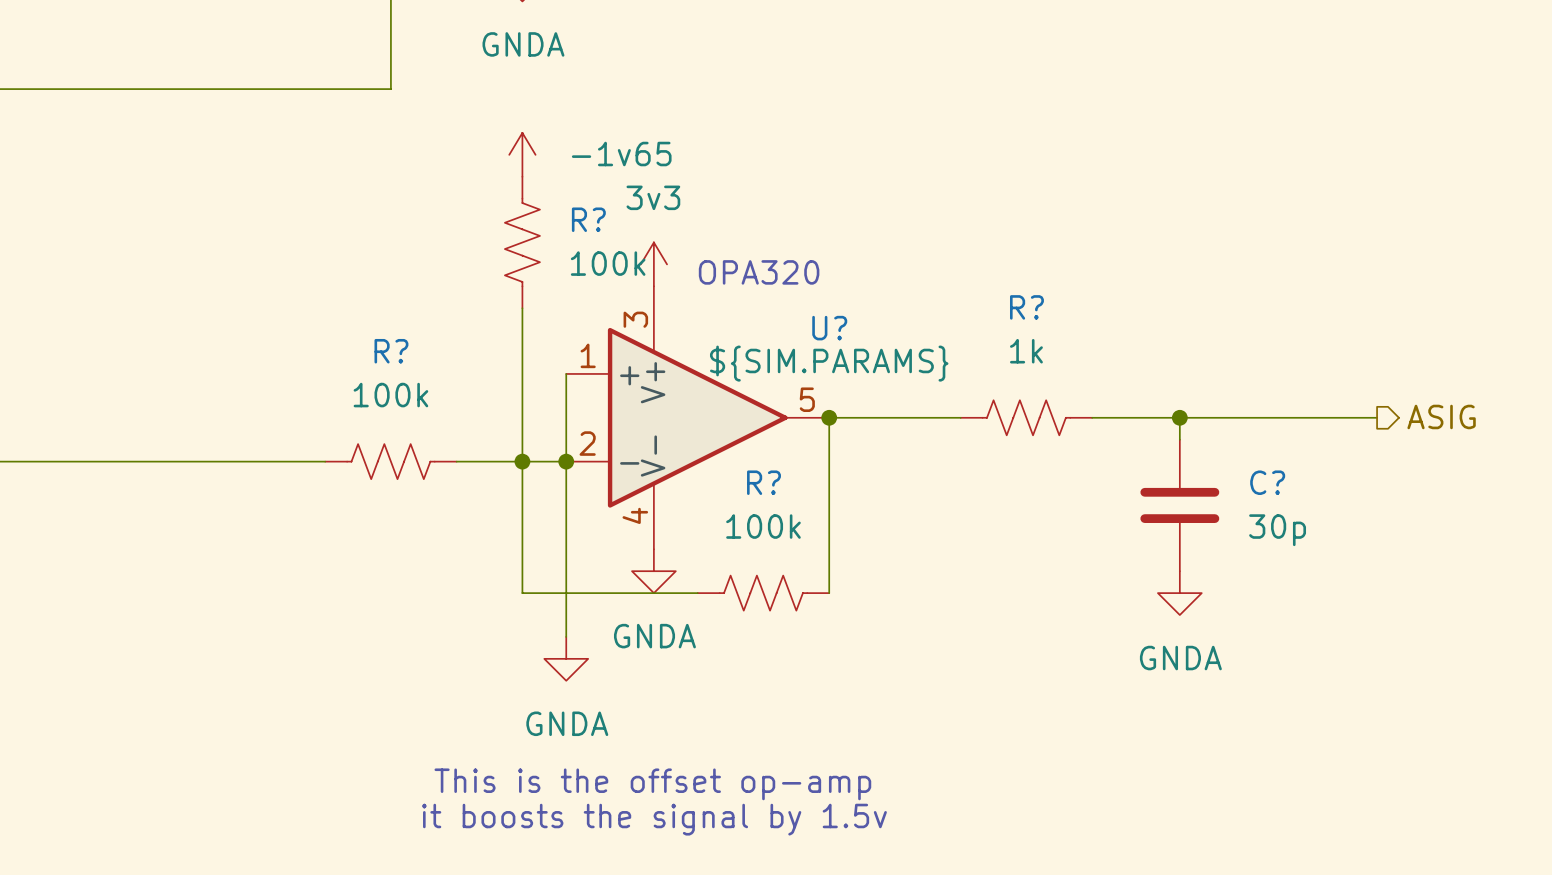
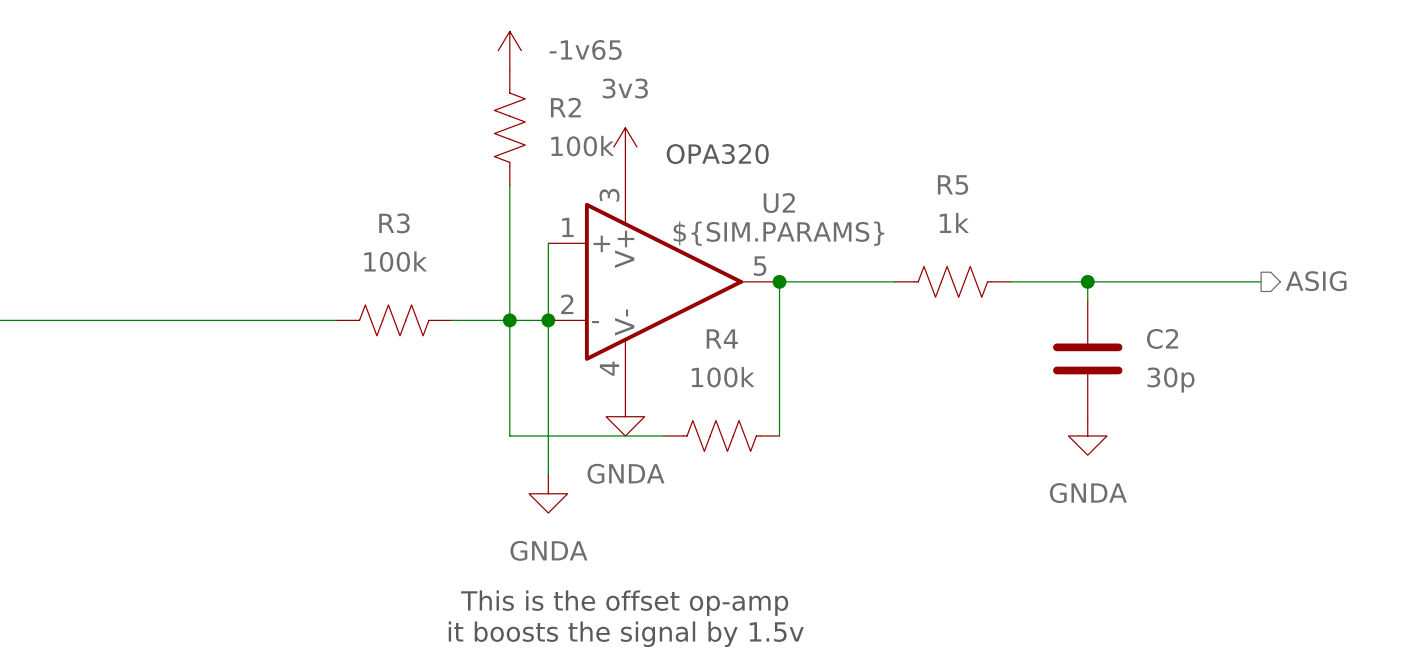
R? name: R? (588, 219) -> R2 (565, 107)
R? name: R? (1026, 307) -> R5 (953, 185)
U? name: U? (829, 328) -> U2 (779, 203)
R? name: R? (391, 351) -> R3 (394, 223)
R? name: R? (763, 482) -> R4 (722, 338)
C? name: C? (1267, 482) -> C2 (1162, 338)

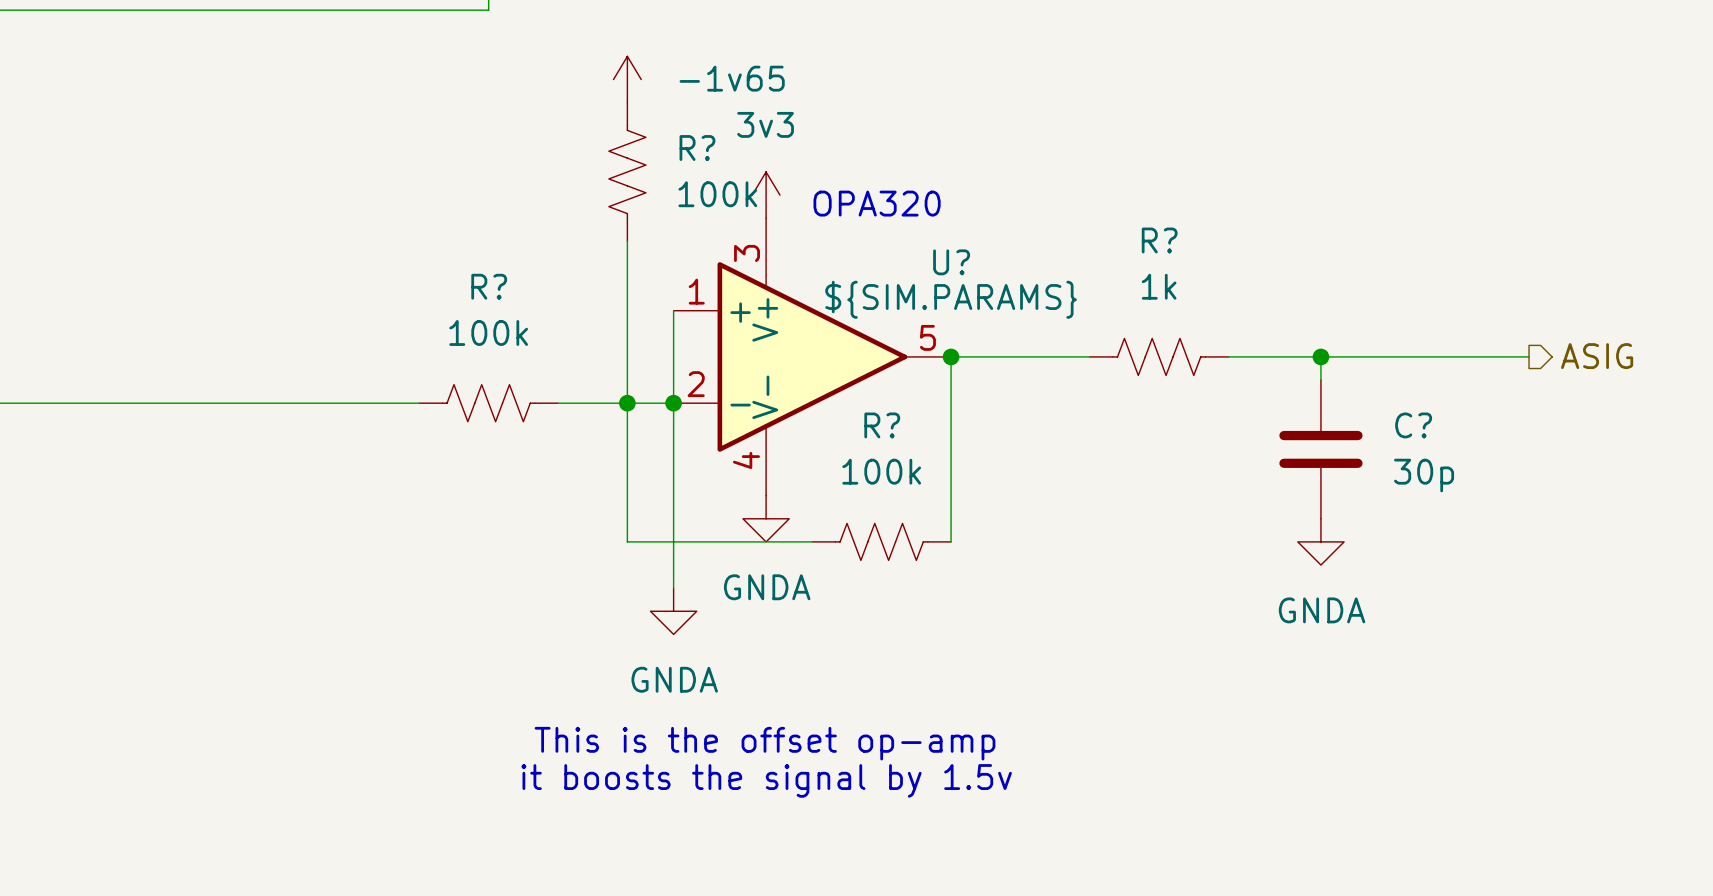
R2 name: R2 (565, 107) -> R? (697, 148)
R5 name: R5 (953, 185) -> R? (1159, 240)
U2 name: U2 (779, 203) -> U? (951, 262)
R3 name: R3 (394, 223) -> R? (489, 286)
R4 name: R4 (722, 338) -> R? (882, 425)
C2 name: C2 (1162, 338) -> C? (1413, 425)

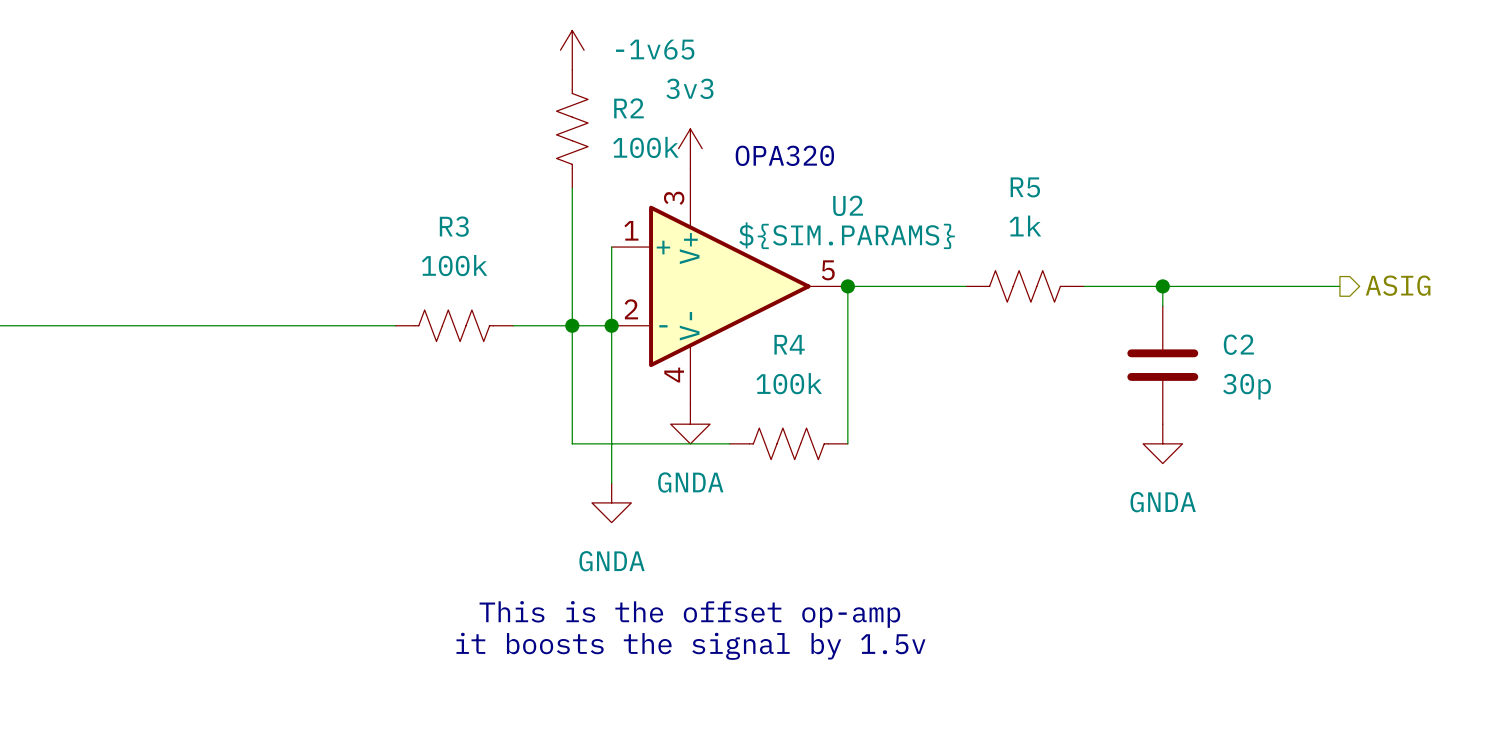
R? name: R? (697, 148) -> R2 (628, 108)
R? name: R? (1159, 240) -> R5 (1025, 187)
U? name: U? (951, 262) -> U2 (848, 205)
R? name: R? (489, 286) -> R3 (454, 226)
R? name: R? (882, 425) -> R4 (789, 344)
C? name: C? (1413, 425) -> C2 (1238, 344)

